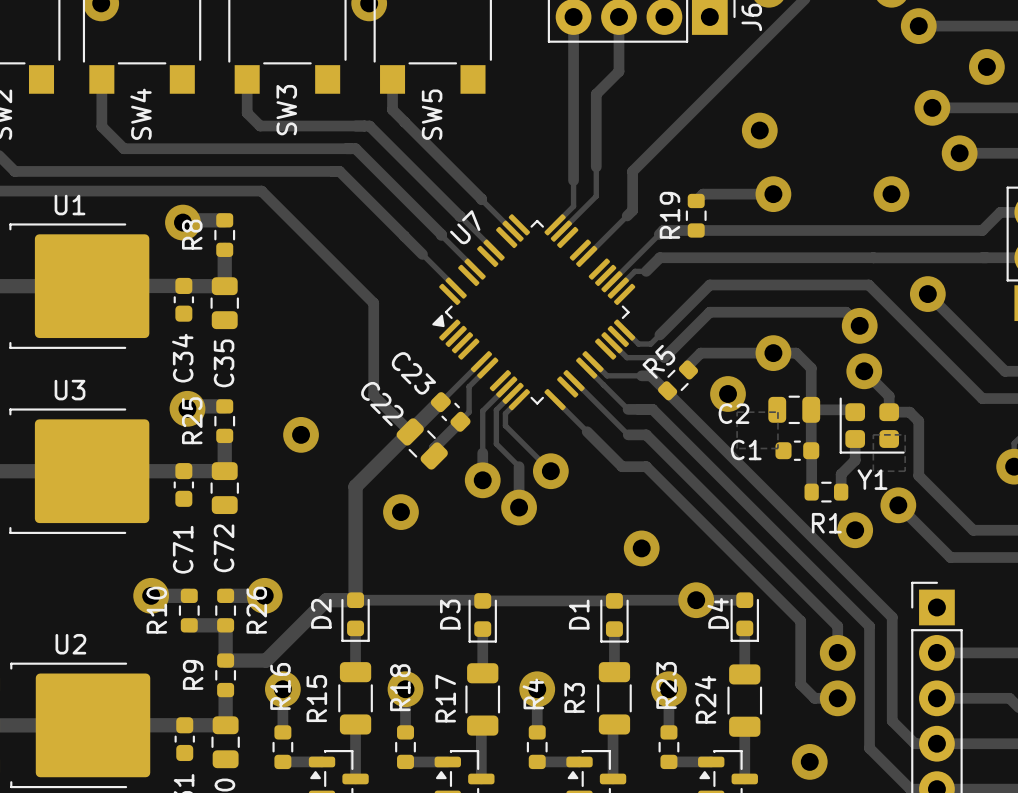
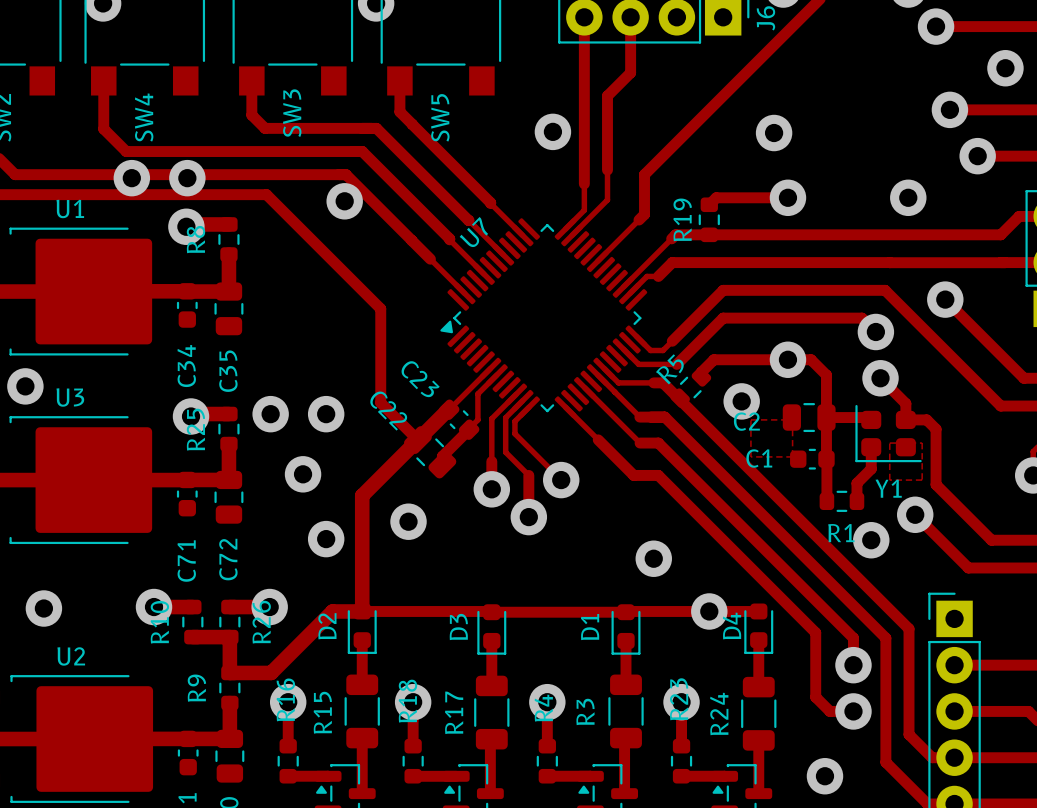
via: none -> (552, 131)
via: none -> (131, 178)
via: none -> (187, 178)
via: none -> (344, 201)
U7 footprint: [432, 214, 636, 411] -> [440, 218, 648, 419]
via: none -> (25, 386)
via: none -> (270, 414)
via: none -> (326, 414)
via: (301, 434) -> none
via: none -> (303, 474)
via: none -> (326, 539)
via: none -> (43, 608)

